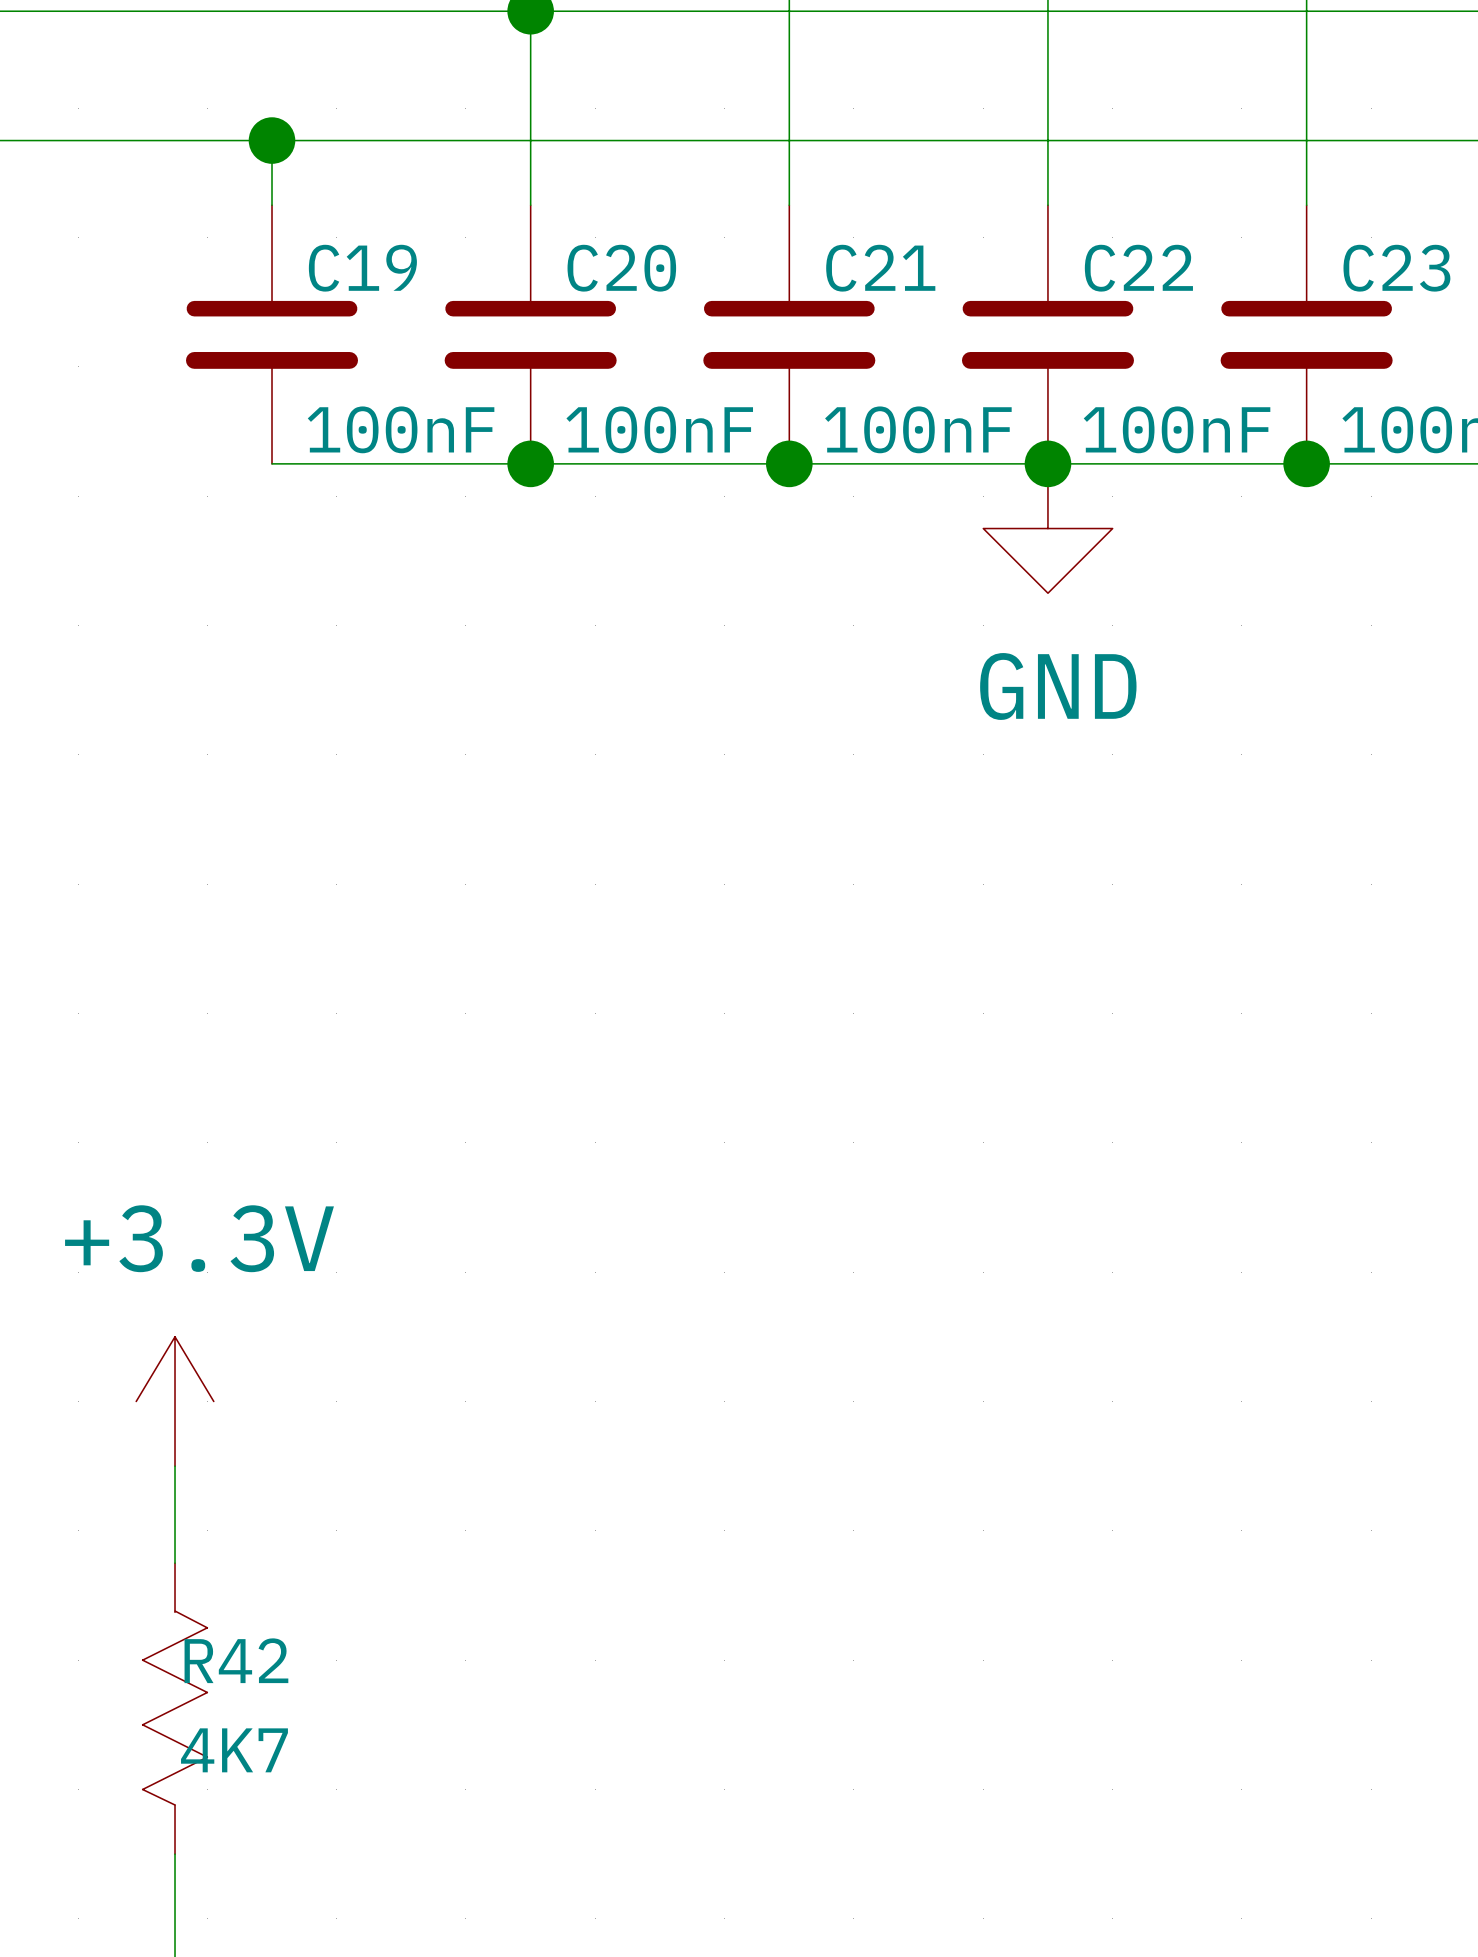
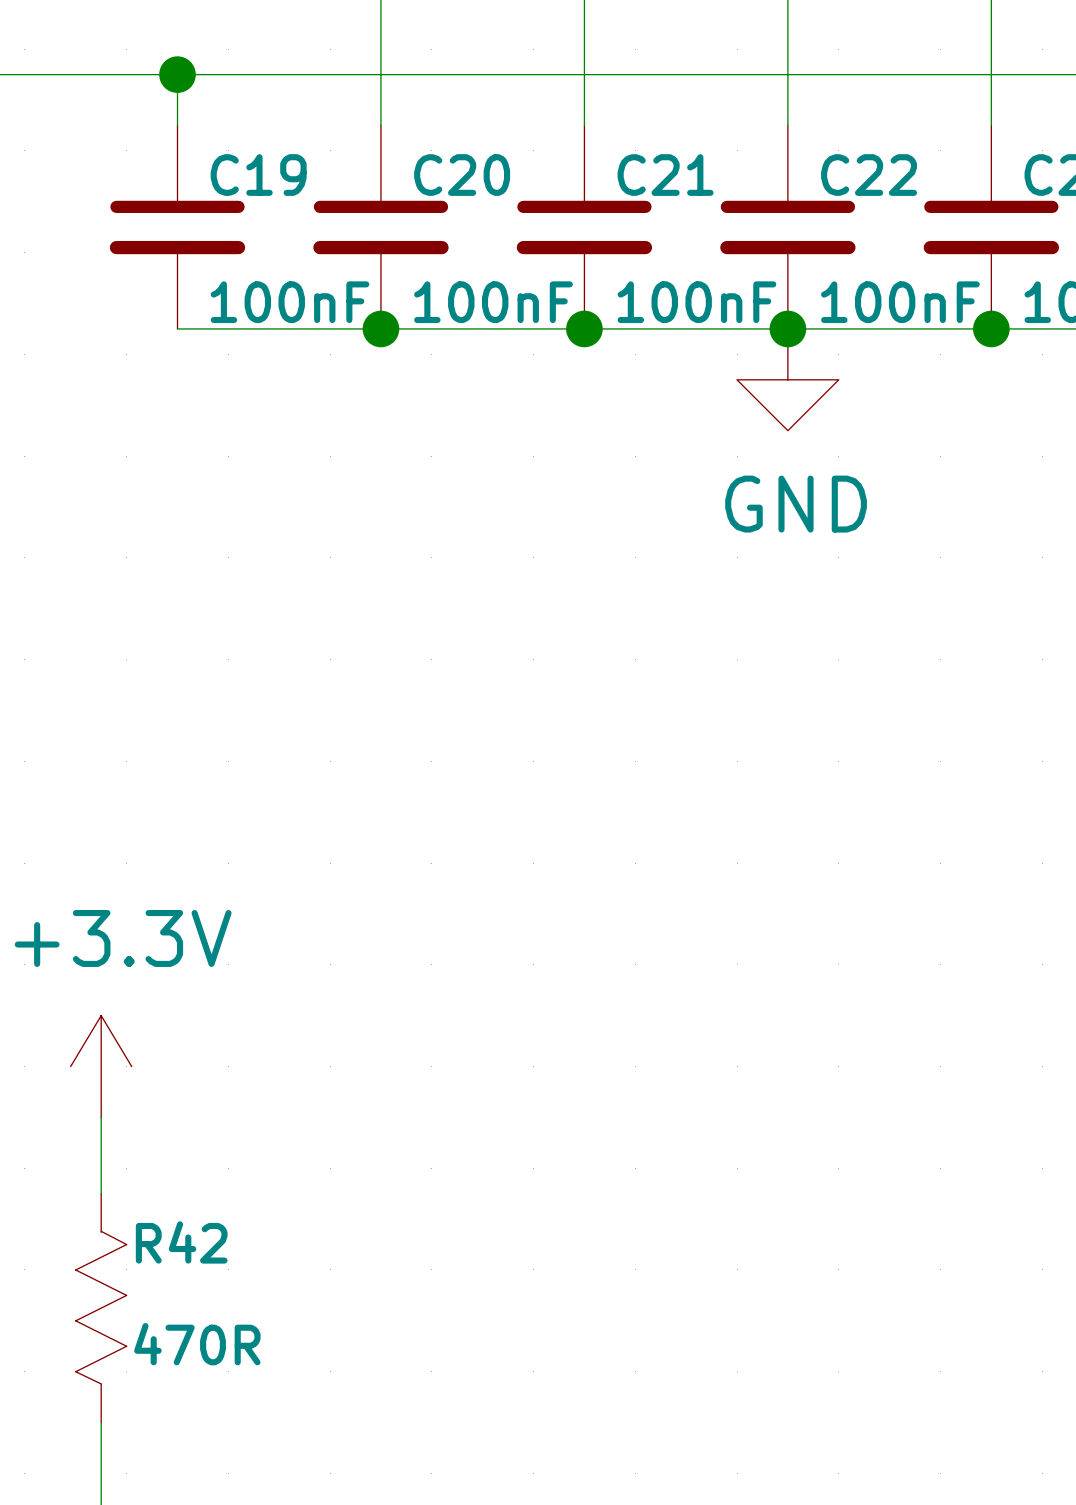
R42 name position: R42 (236, 1660) -> R42 (181, 1242)
R42 value: 4K7 (234, 1750) -> 470R (197, 1344)

